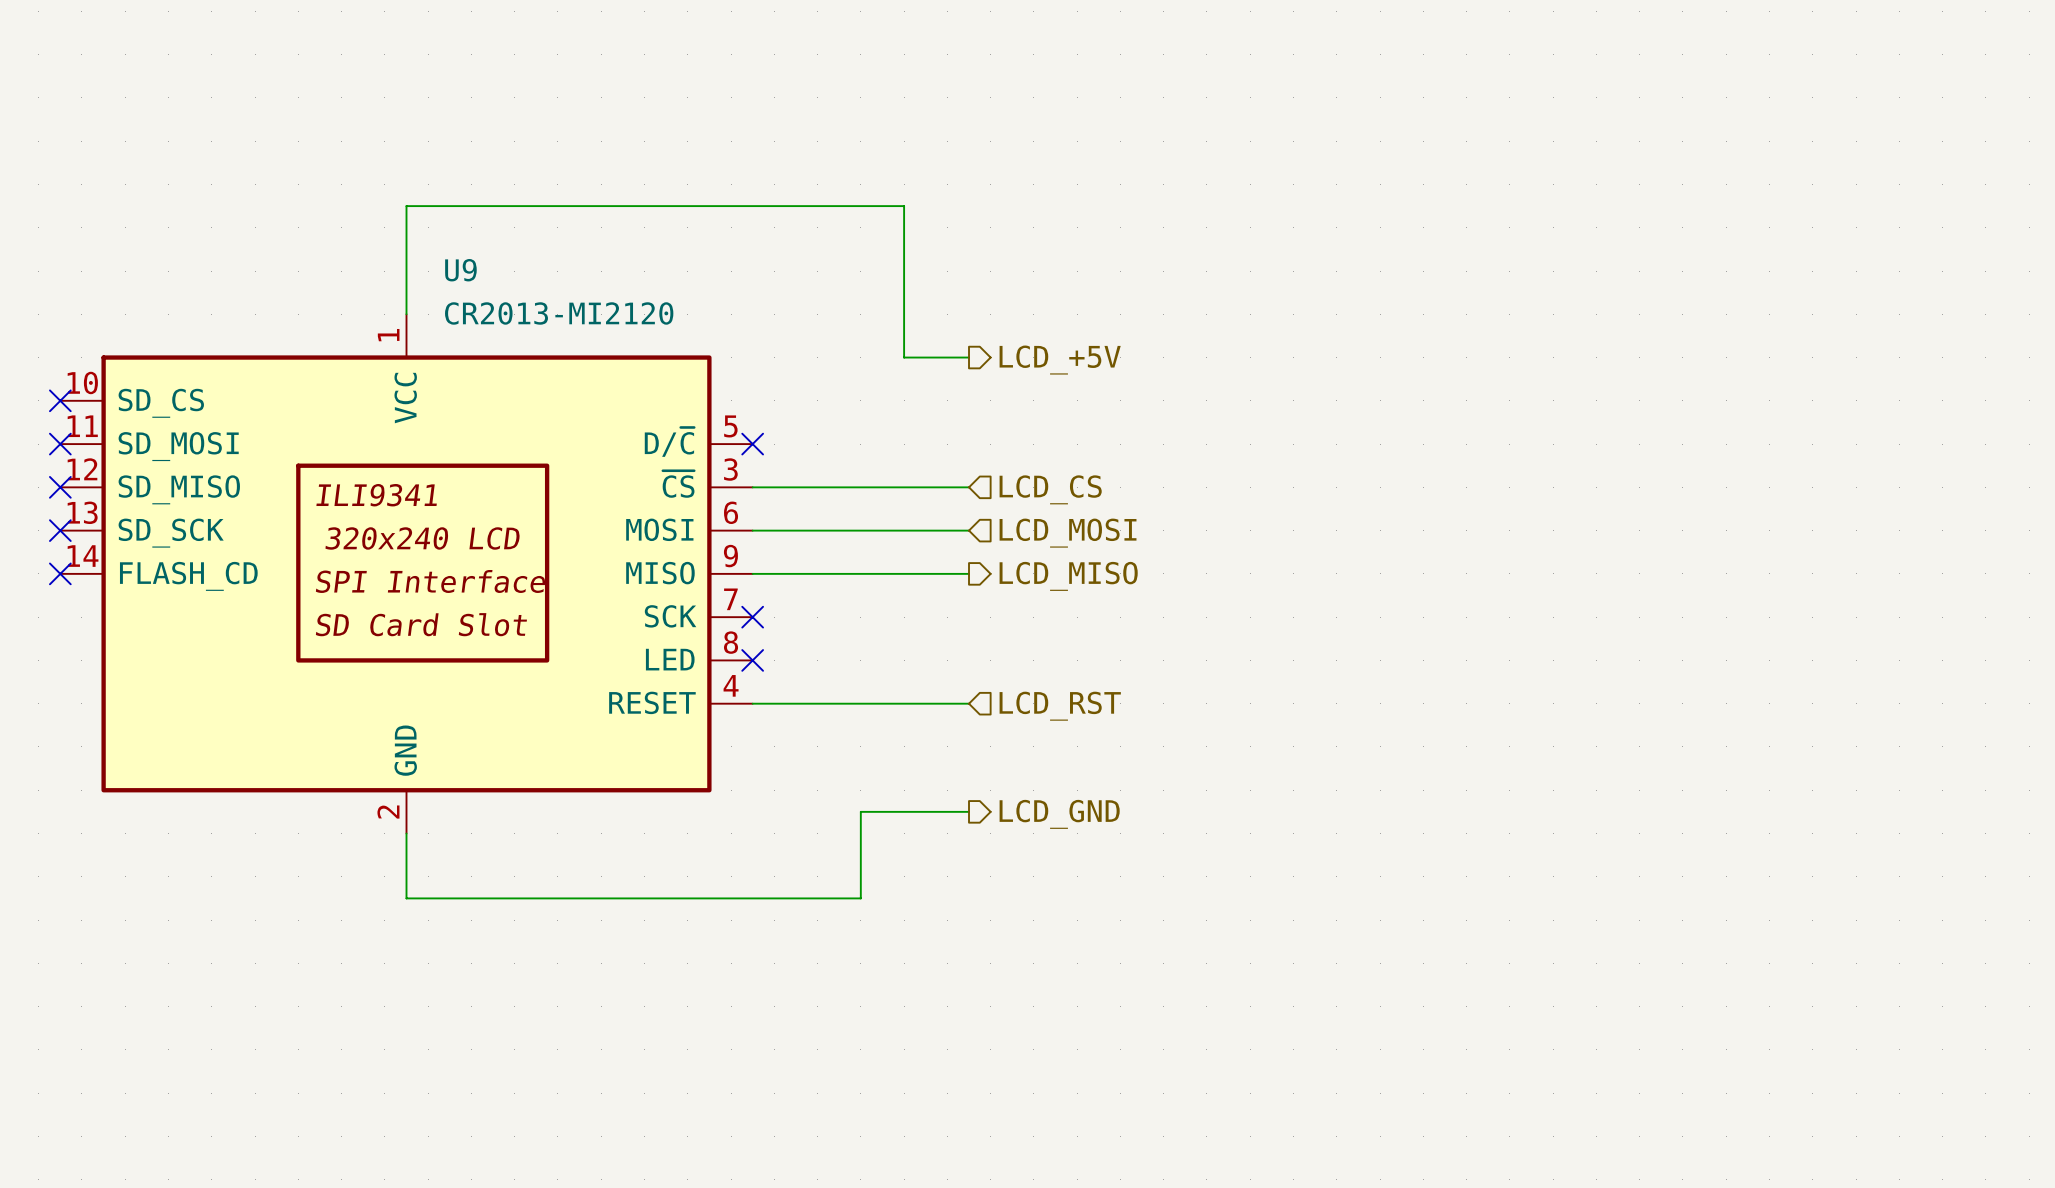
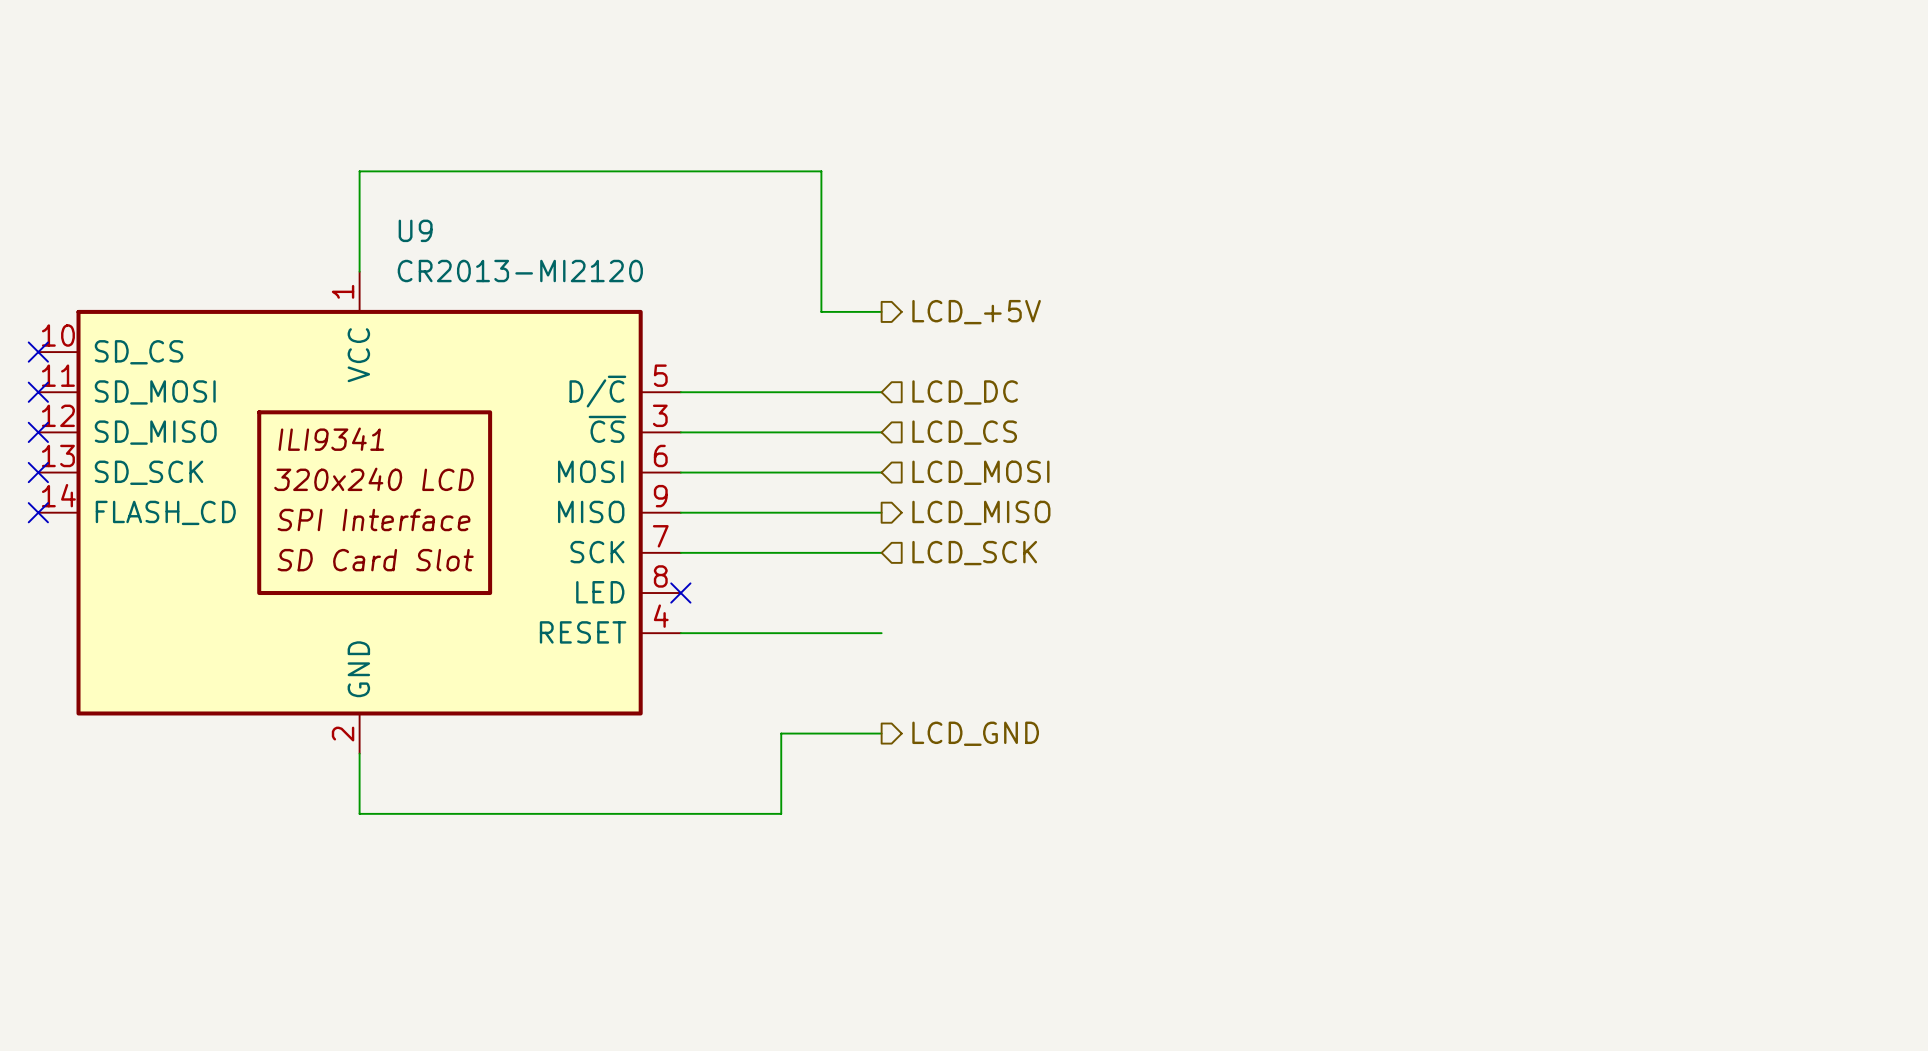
wire: none -> (680, 392) (881, 392)
no-connect mark: (752, 444) -> none
hierarchical label: none -> LCD_DC (965, 392)
wire: none -> (680, 552) (881, 552)
no-connect mark: (752, 617) -> none
hierarchical label: none -> LCD_SCK (974, 553)
hierarchical label: LCD_RST (1060, 706) -> none

